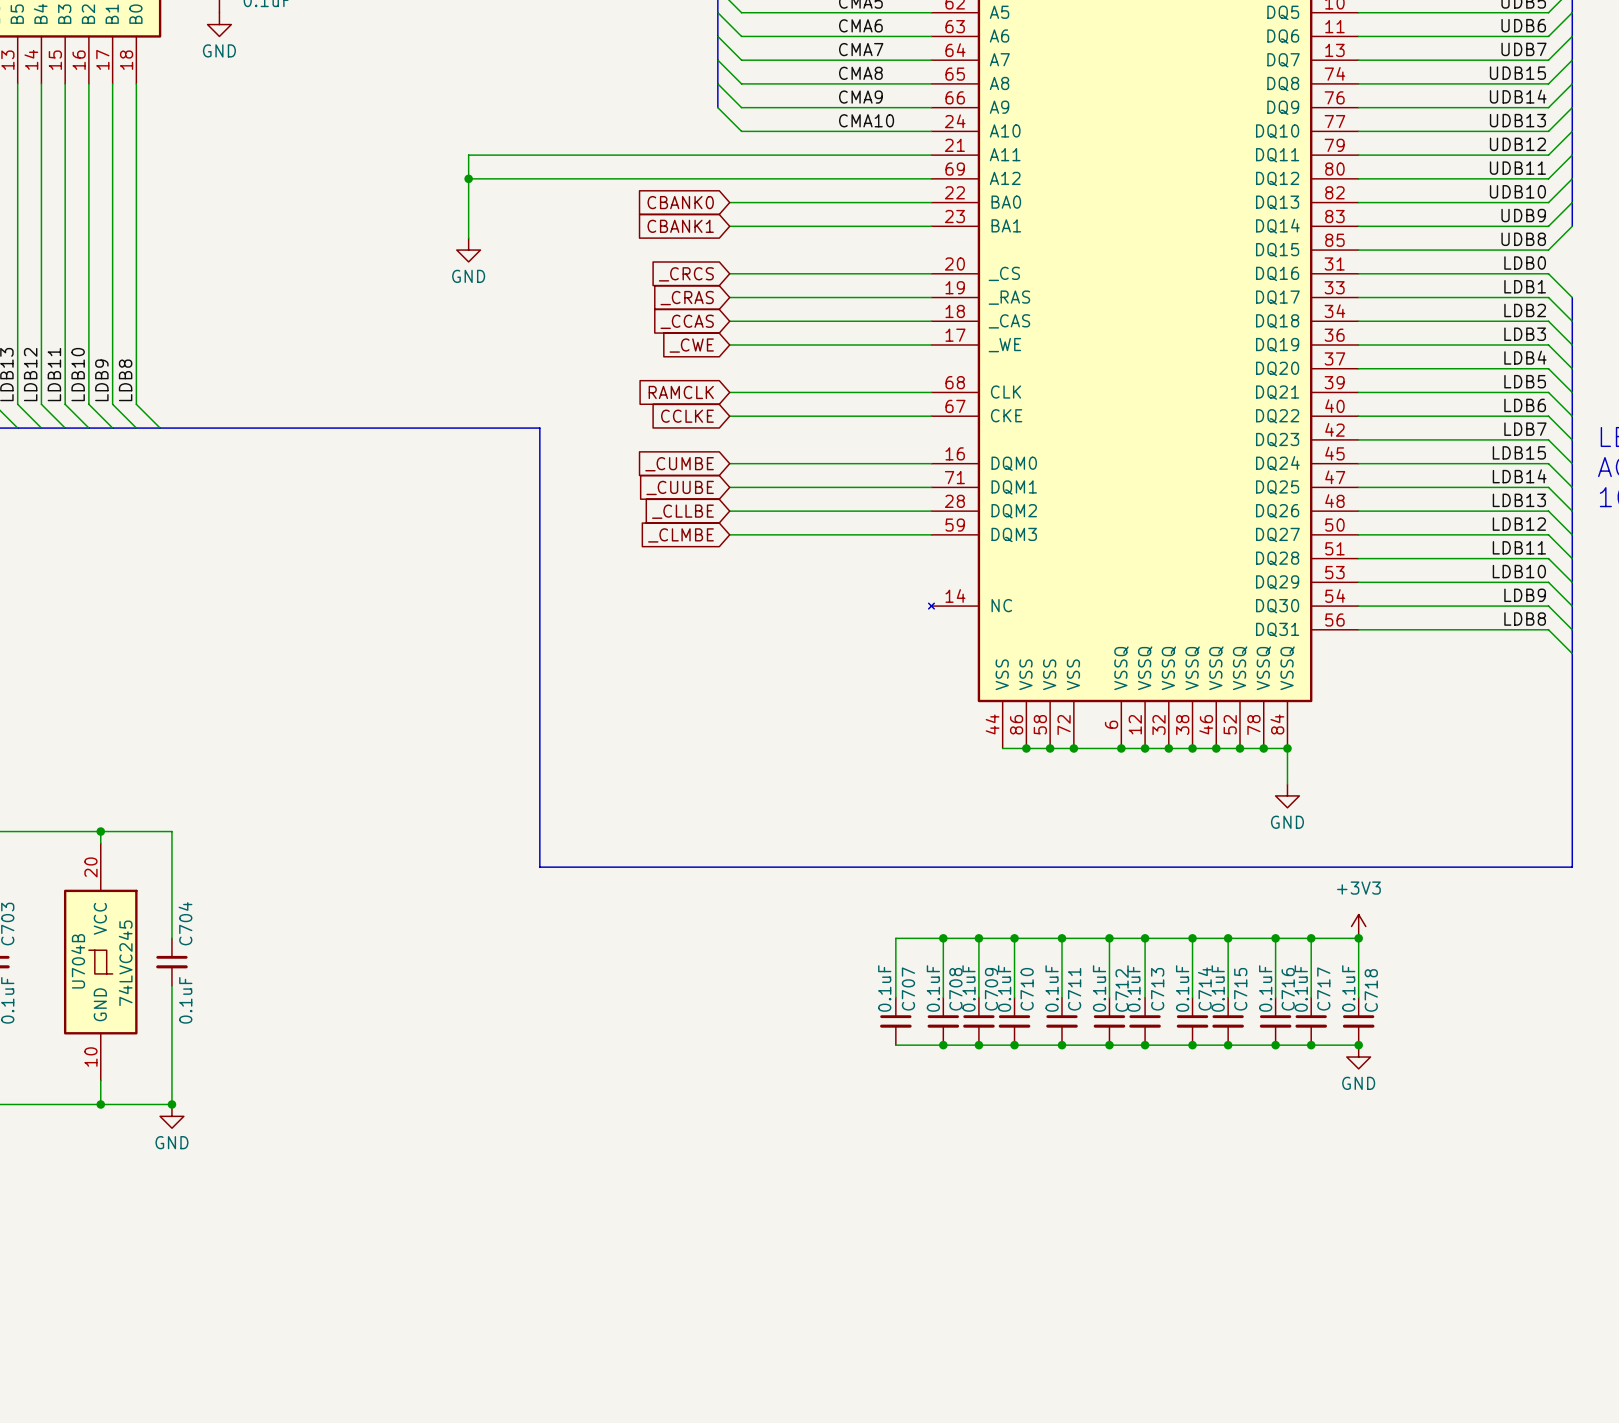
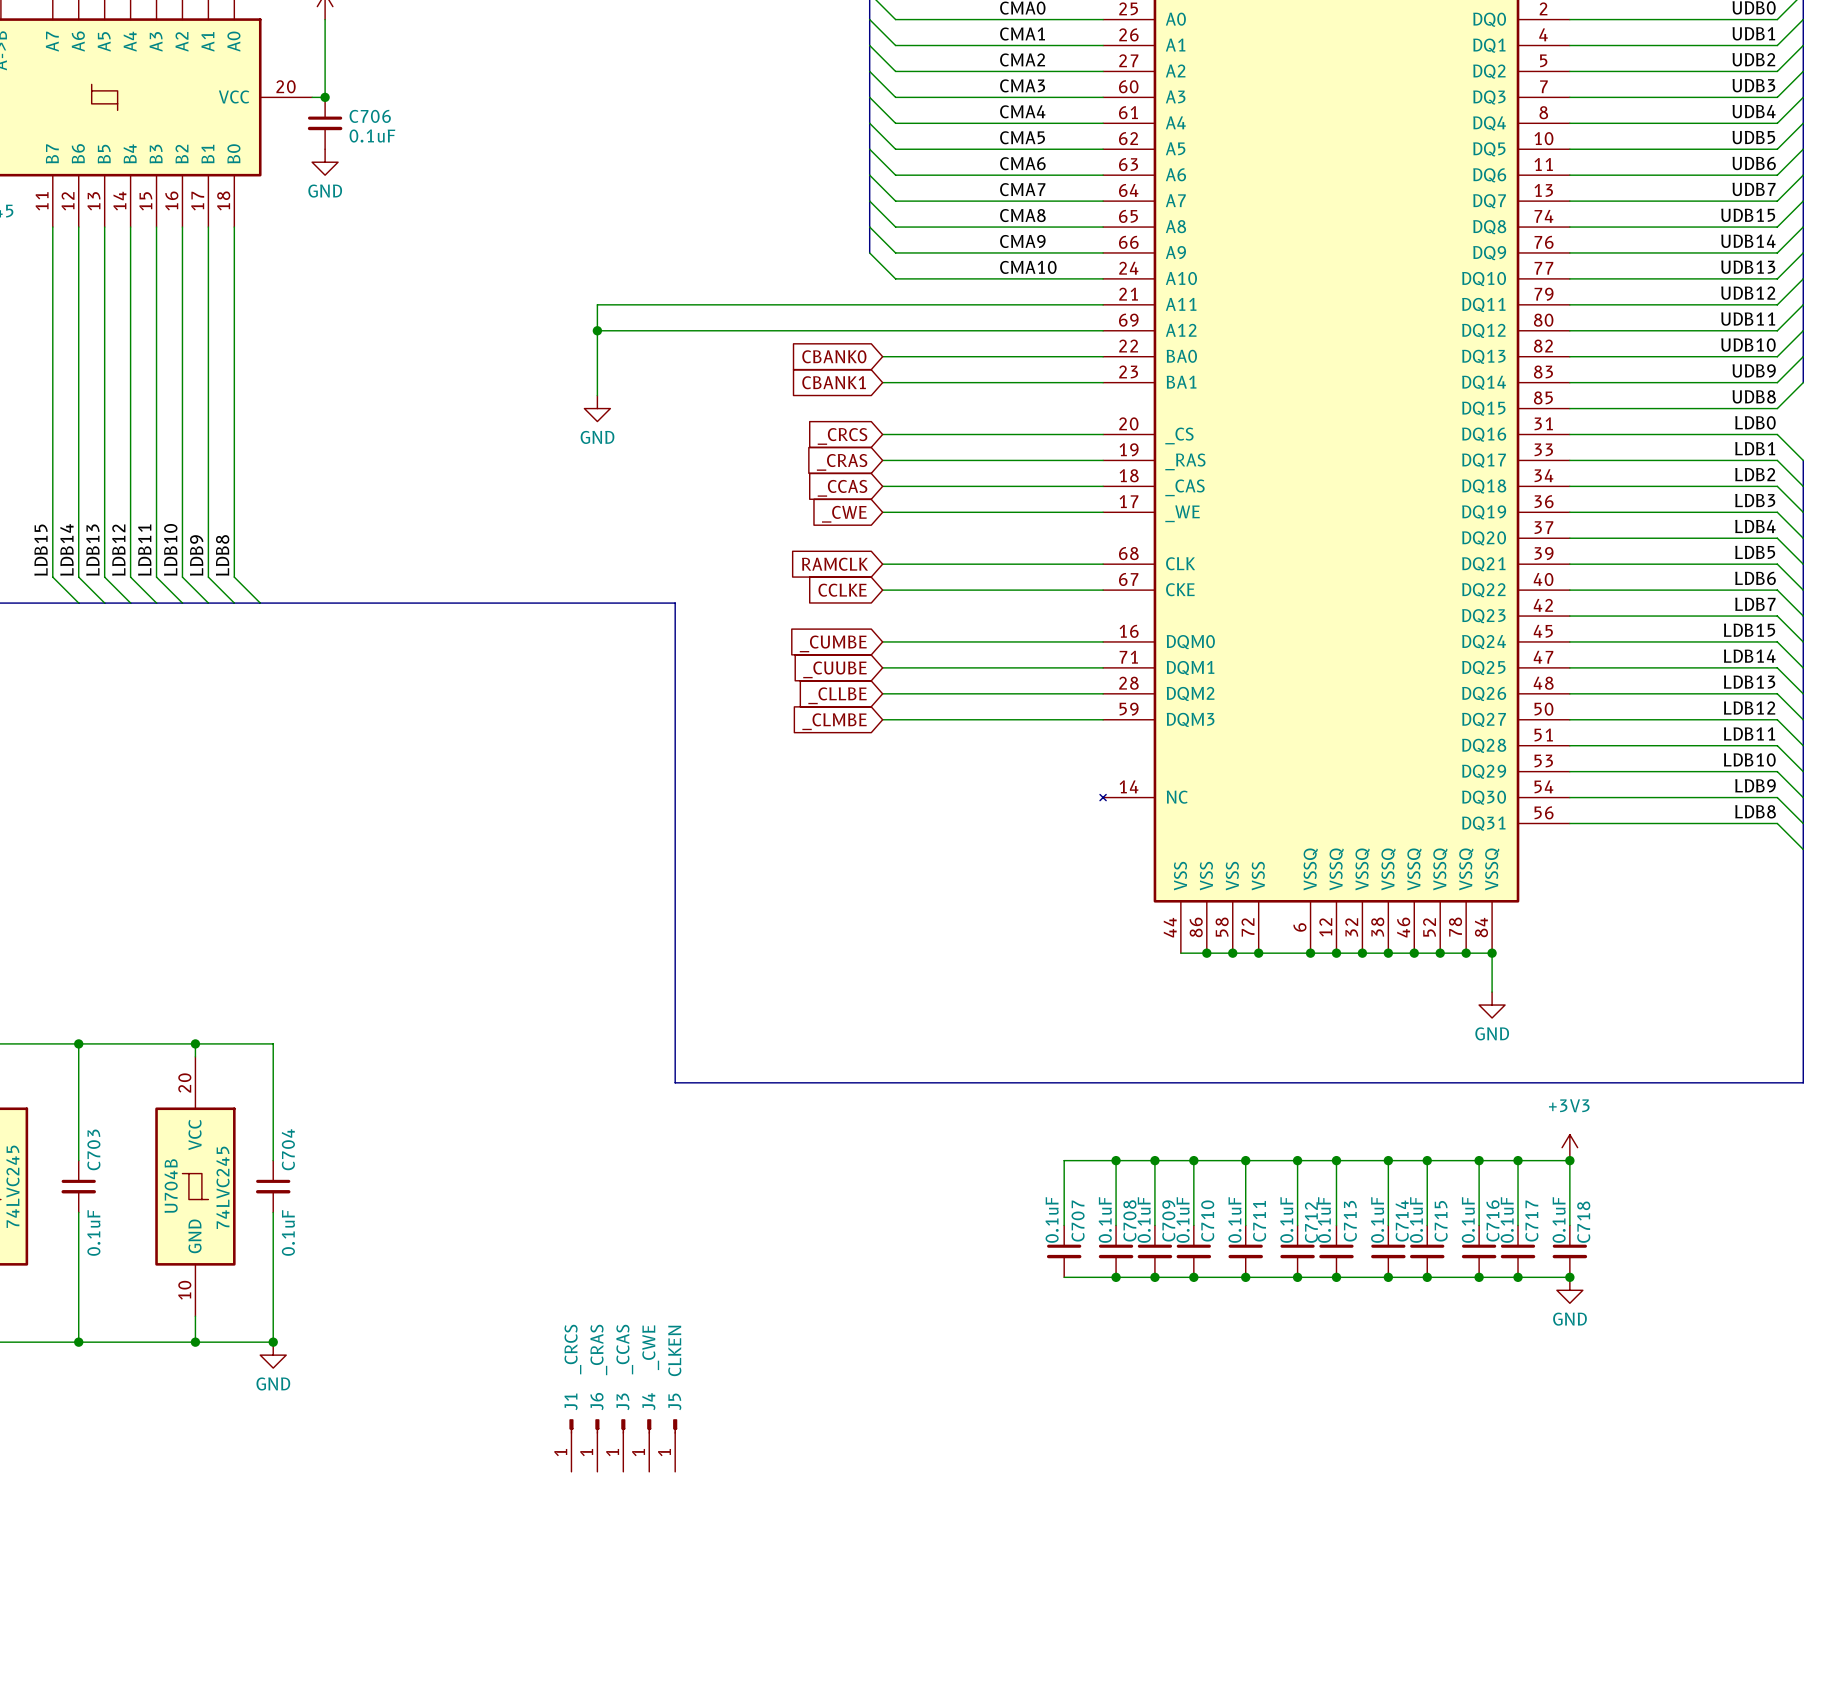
J1: none -> _CRCS (571, 1445)
J6: none -> _CRAS (597, 1445)
J3: none -> _CCAS (623, 1445)
J4: none -> _CWE (649, 1445)
J5: none -> CLKEN (675, 1445)

